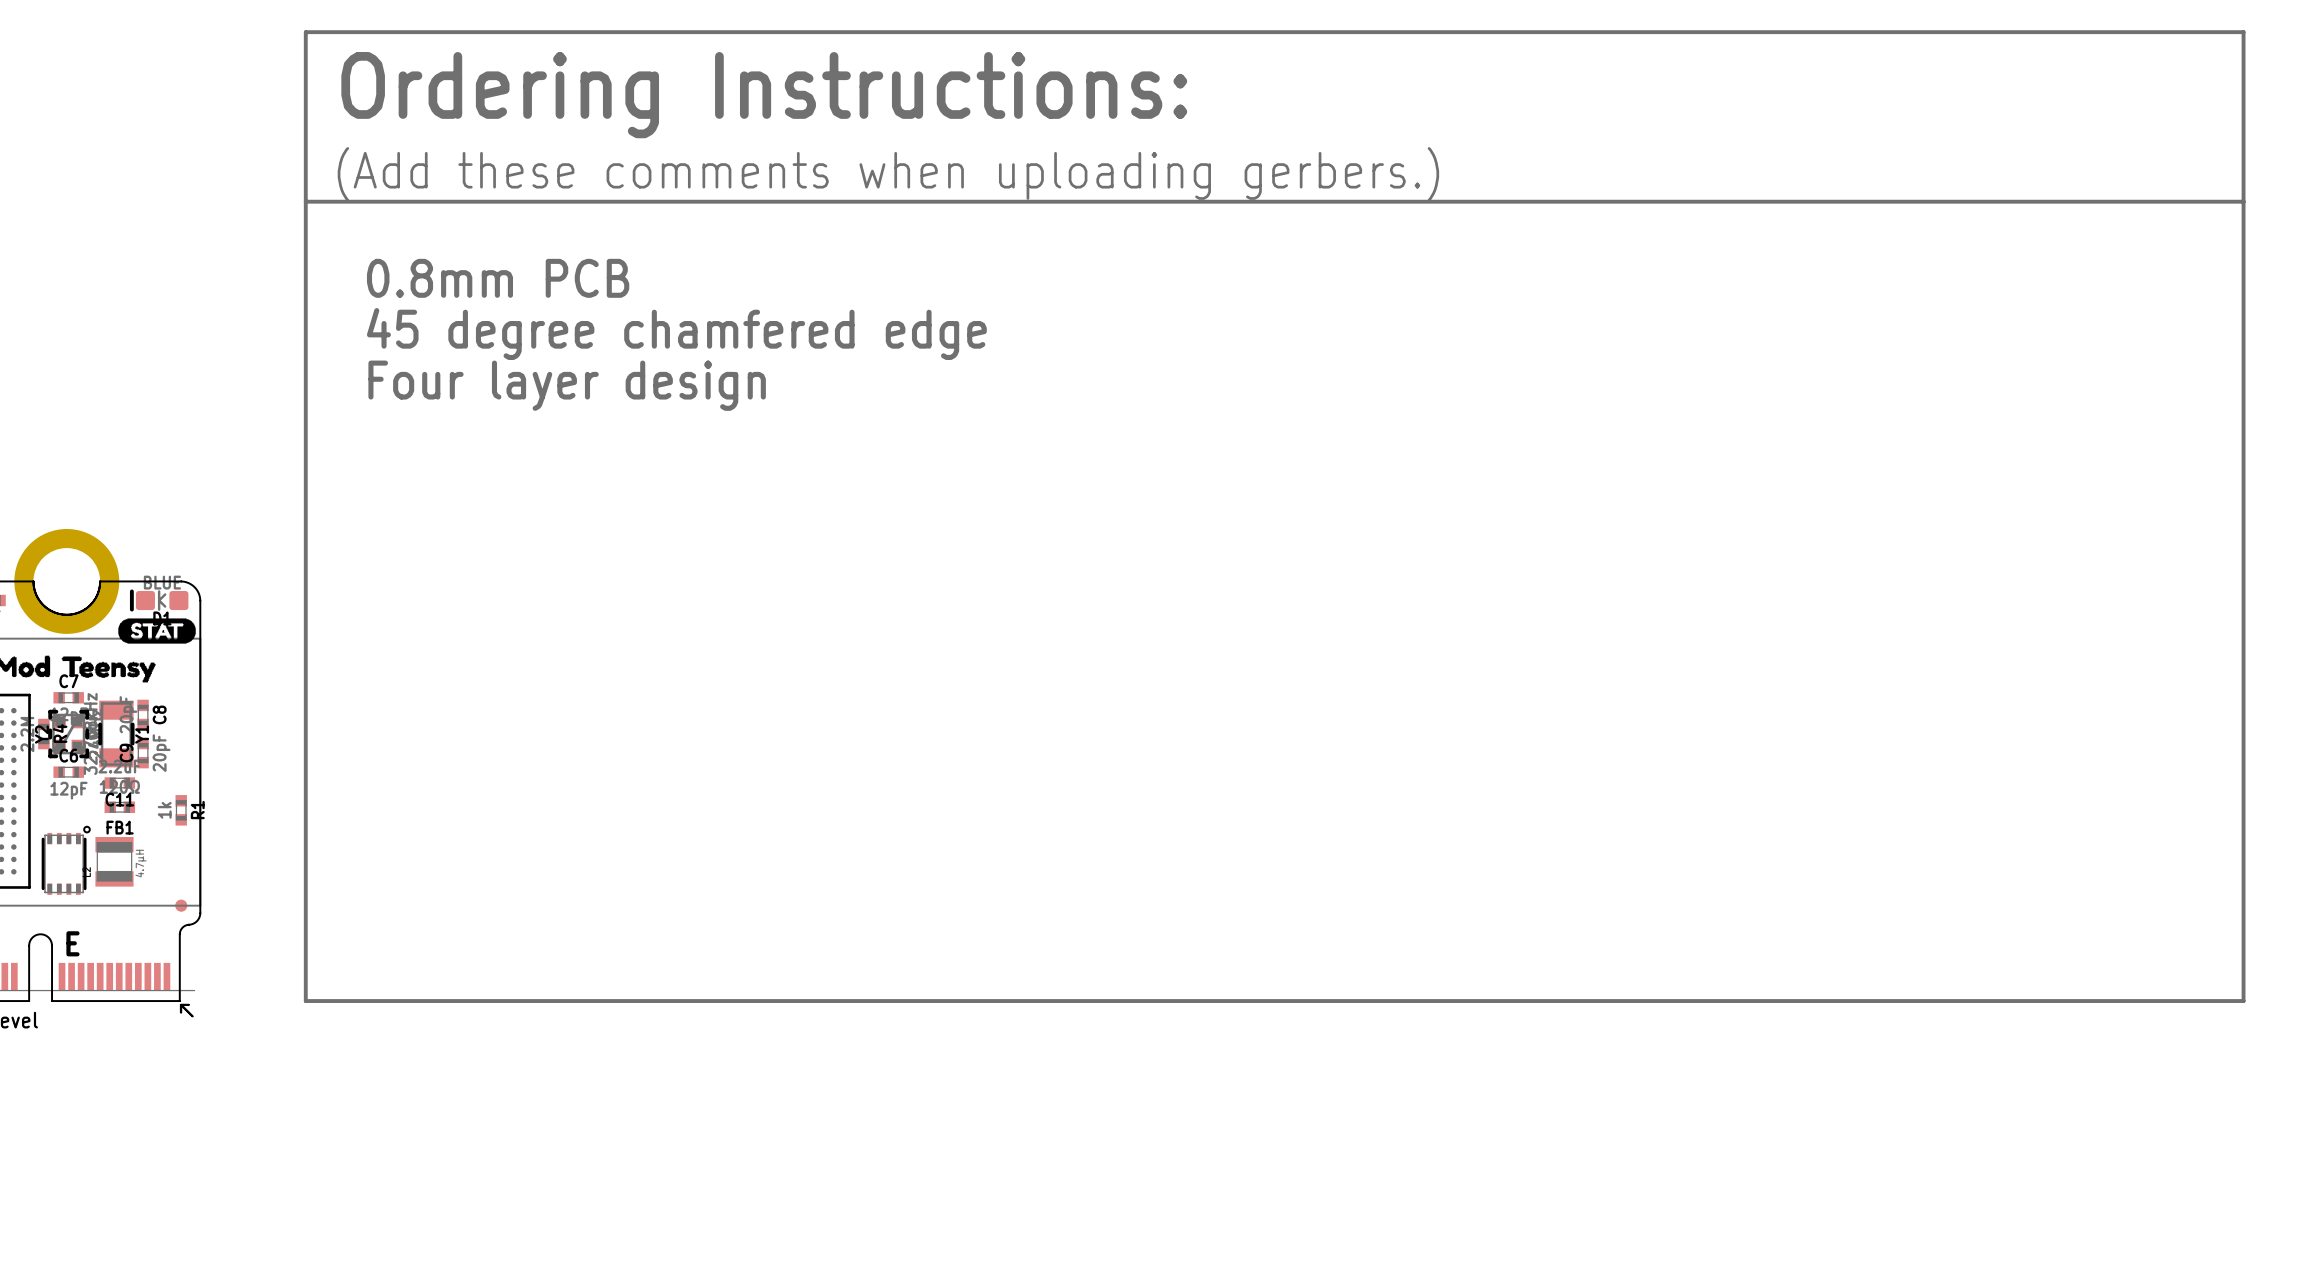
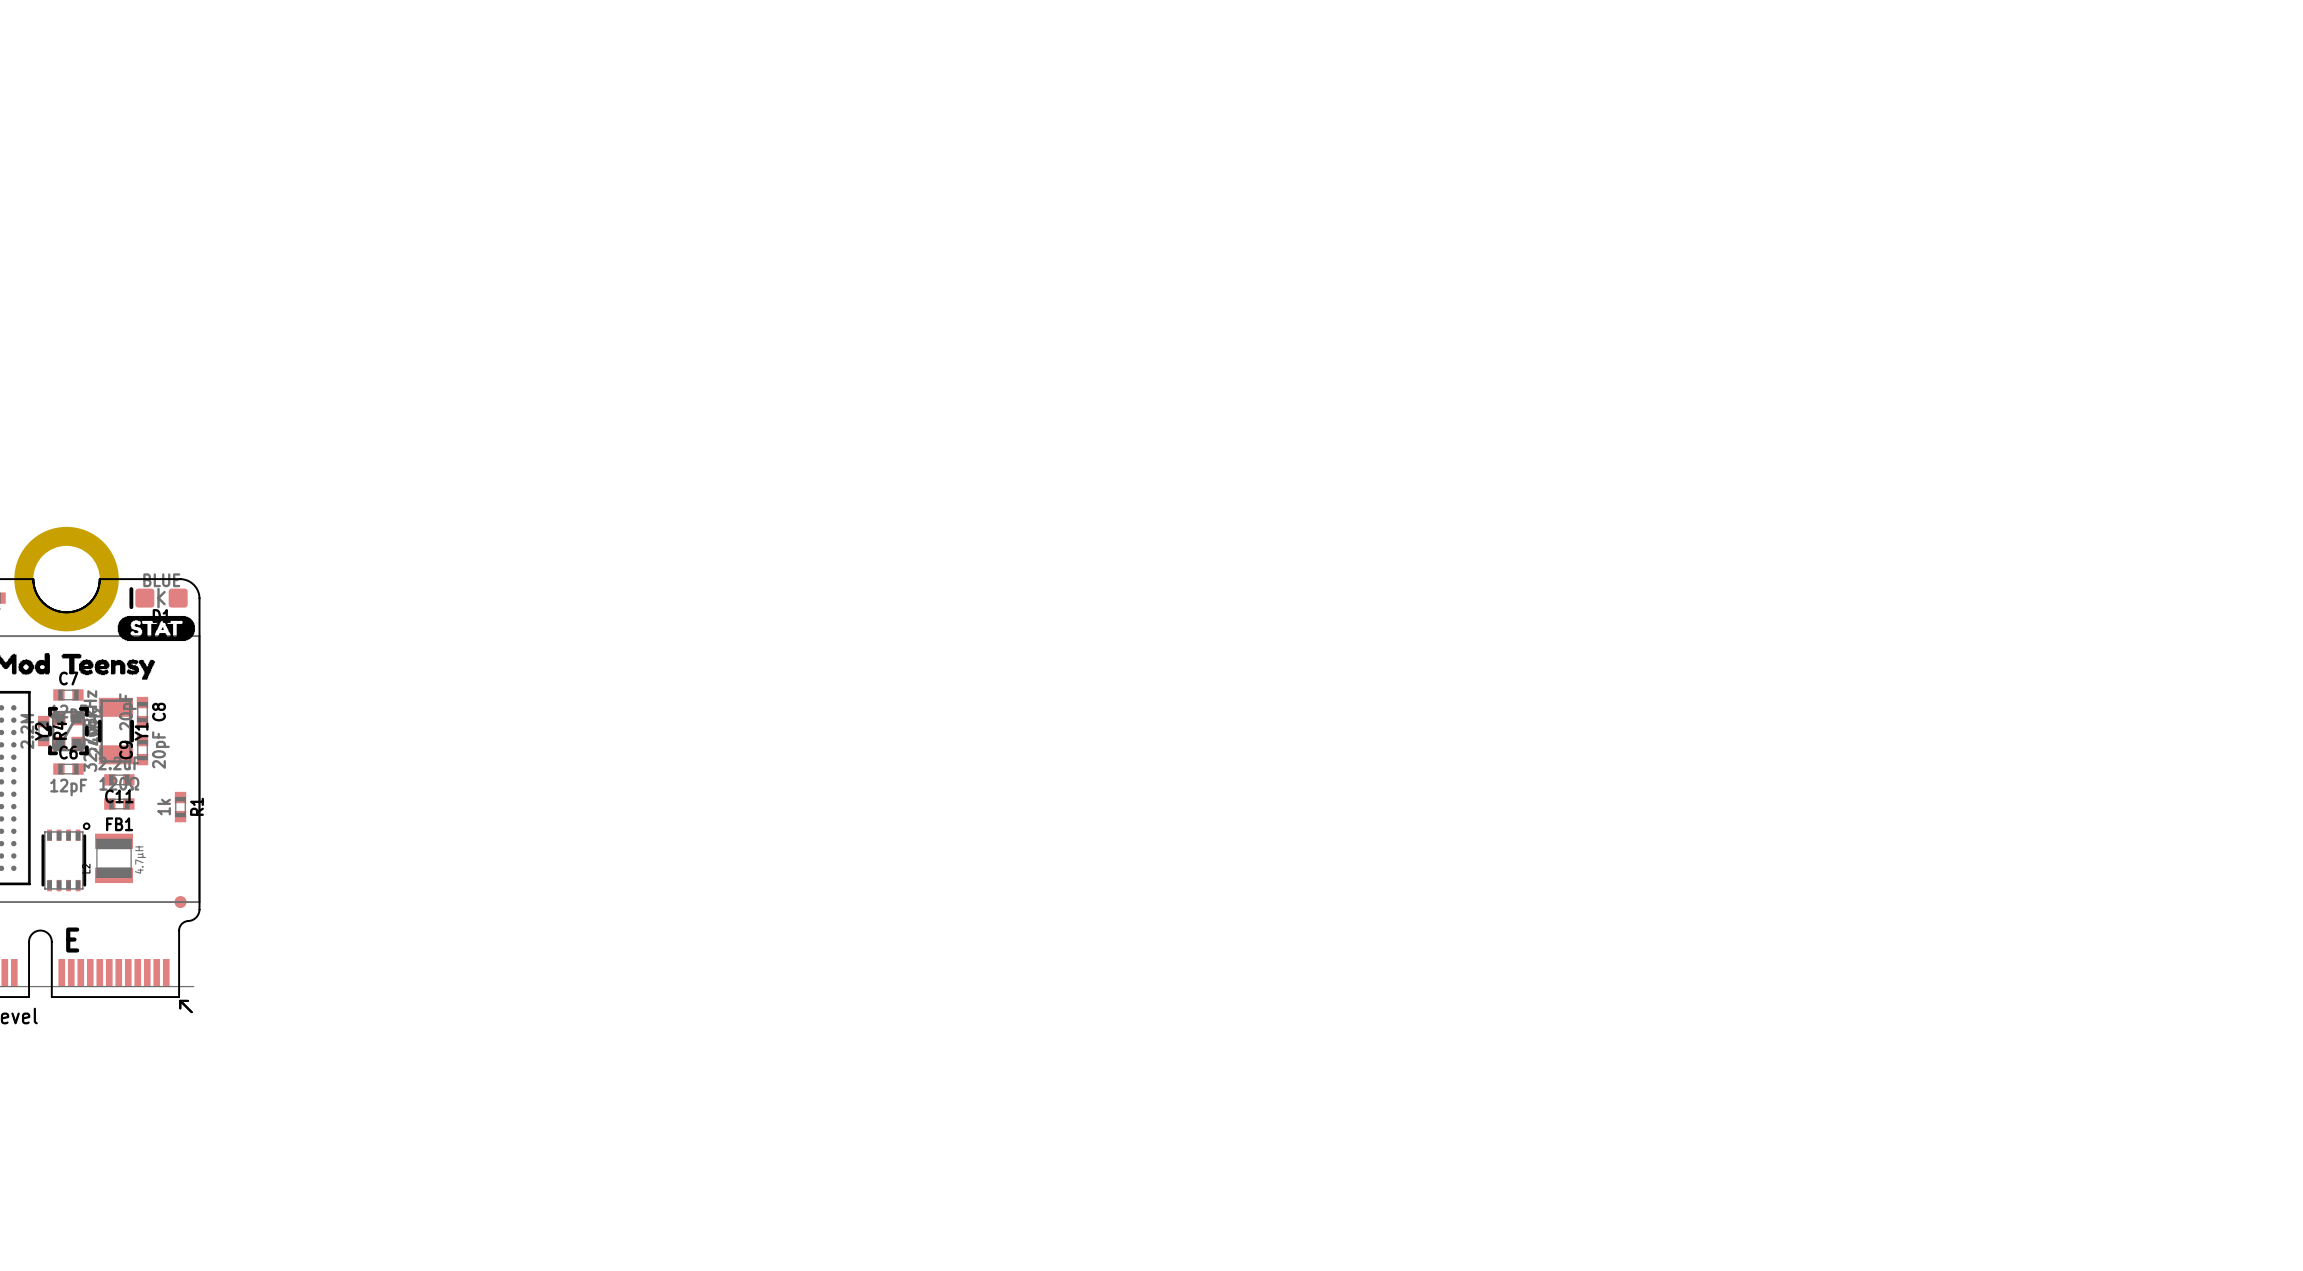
drawing: [303, 30, 2246, 1003] -> none
text: 0.8mm PCB (498, 278) -> none
text: 45 degree chamfered edge (676, 334) -> none
text: Four layer design (567, 385) -> none

